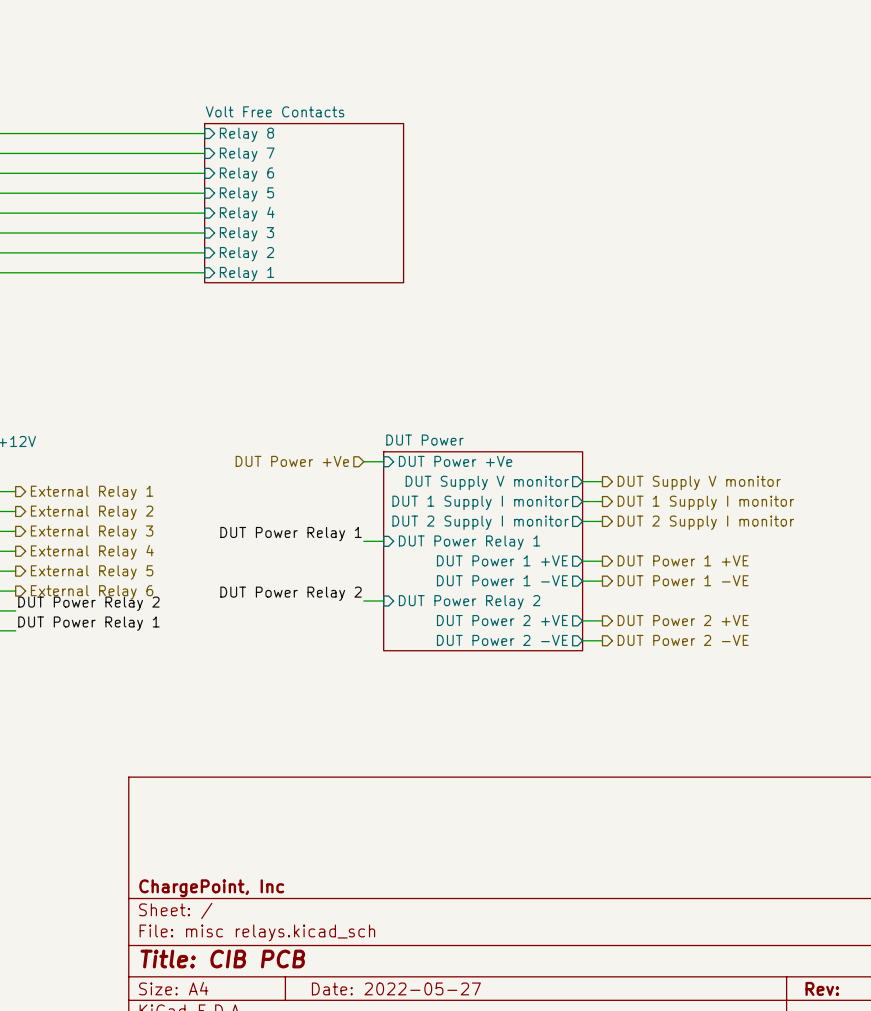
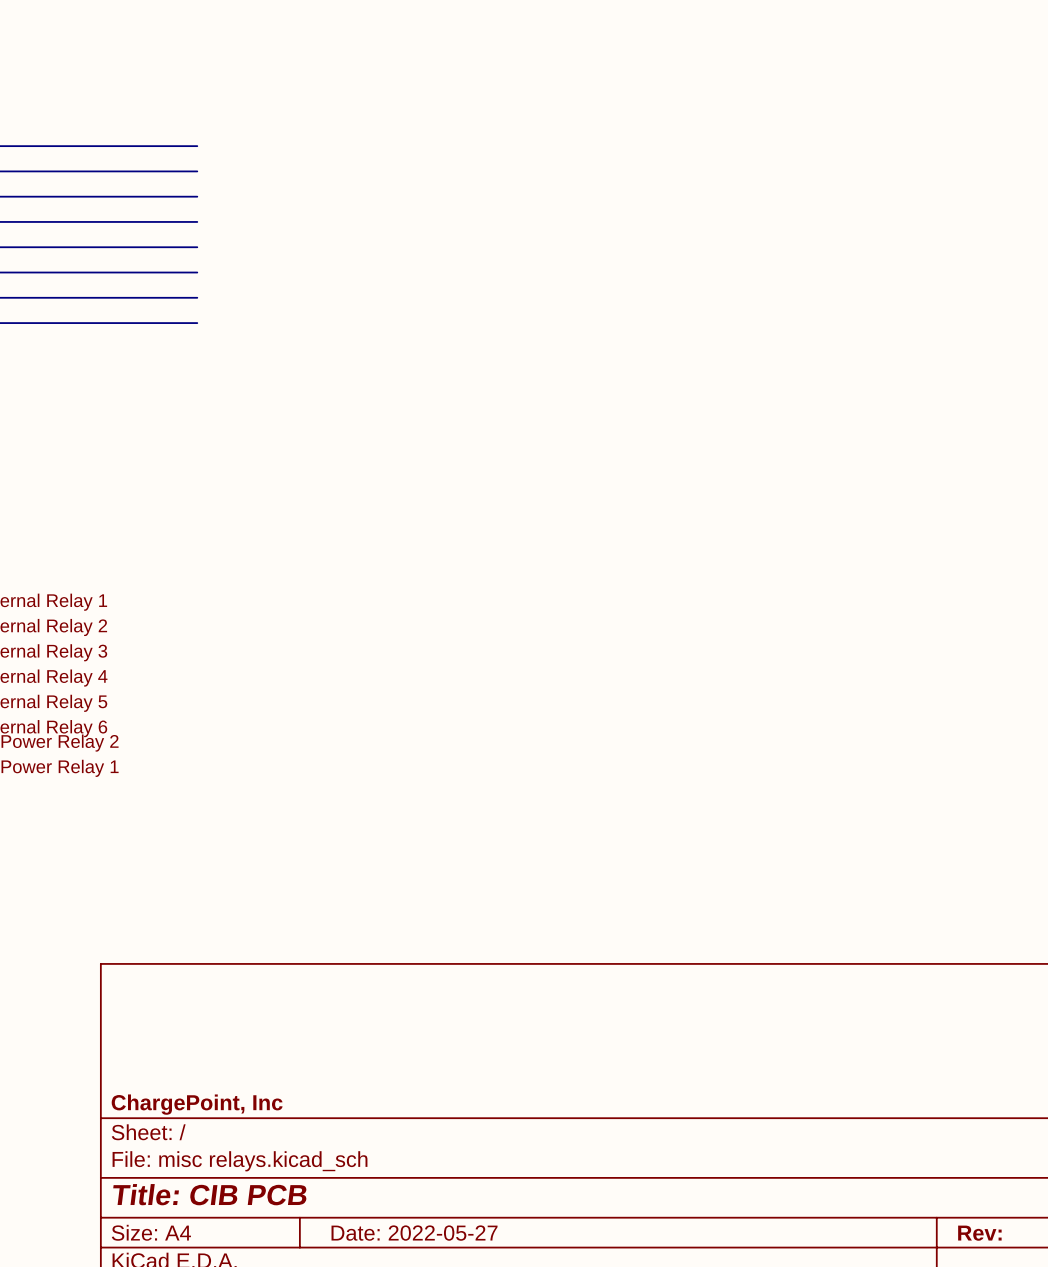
sheet pin: Relay 8 (246, 134) -> none
sheet pin: Relay 7 (247, 154) -> none
sheet pin: Relay 6 (246, 174) -> none
sheet pin: Relay 5 (246, 194) -> none
sheet Volt Free Contacts: (304, 203) -> none
sheet pin: Relay 4 (247, 214) -> none
sheet pin: Relay 3 (246, 234) -> none
sheet pin: Relay 2 (246, 254) -> none
sheet pin: Relay 1 (246, 274) -> none
hierarchical label: DUT Power +Ve (292, 461) -> none
wire: (363, 461) (383, 461) -> none
sheet pin: DUT Power +Ve (455, 461) -> none
wire: (582, 481) (602, 481) -> none
sheet pin: DUT Supply V monitor (487, 482) -> none
hierarchical label: DUT Supply V monitor (699, 482) -> none
wire: (582, 501) (602, 501) -> none
sheet pin: DUT 1 Supply I monitor (480, 502) -> none
hierarchical label: DUT 1 Supply I monitor (705, 502) -> none
wire: (582, 521) (602, 521) -> none
sheet pin: DUT 2 Supply I monitor (480, 522) -> none
hierarchical label: DUT 2 Supply I monitor (705, 522) -> none
label: DUT Power Relay 1 (291, 534) -> none
wire: (363, 541) (383, 541) -> none
sheet pin: DUT Power Relay 1 (469, 542) -> none
sheet DUT Power: (483, 551) -> none
sheet pin: DUT Power 1 +VE (502, 560) -> none
hierarchical label: DUT Power 1 +VE (683, 560) -> none
wire: (582, 561) (602, 561) -> none
sheet pin: DUT Power 1 -VE (502, 580) -> none
hierarchical label: DUT Power 1 -VE (683, 580) -> none
wire: (582, 581) (602, 581) -> none
label: DUT Power Relay 2 (291, 593) -> none
wire: (363, 601) (383, 601) -> none
sheet pin: DUT Power Relay 2 (469, 602) -> none
sheet pin: DUT Power 2 +VE (502, 620) -> none
wire: (582, 620) (602, 620) -> none
hierarchical label: DUT Power 2 +VE (683, 620) -> none
sheet pin: DUT Power 2 -VE (502, 640) -> none
wire: (582, 640) (602, 640) -> none
hierarchical label: DUT Power 2 -VE (683, 640) -> none

